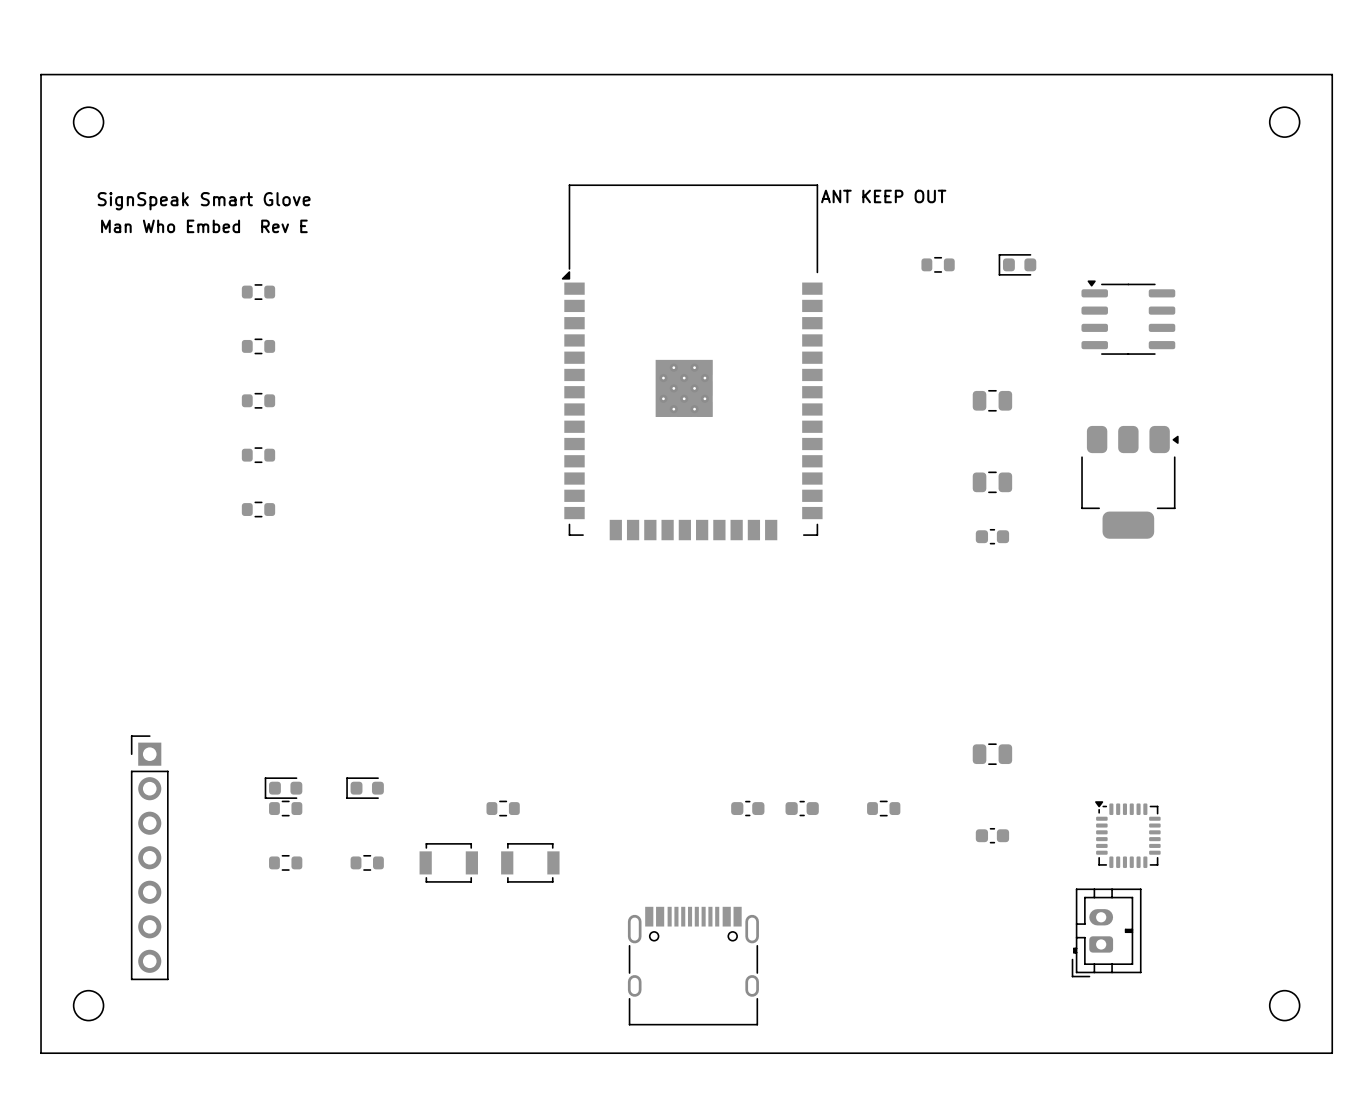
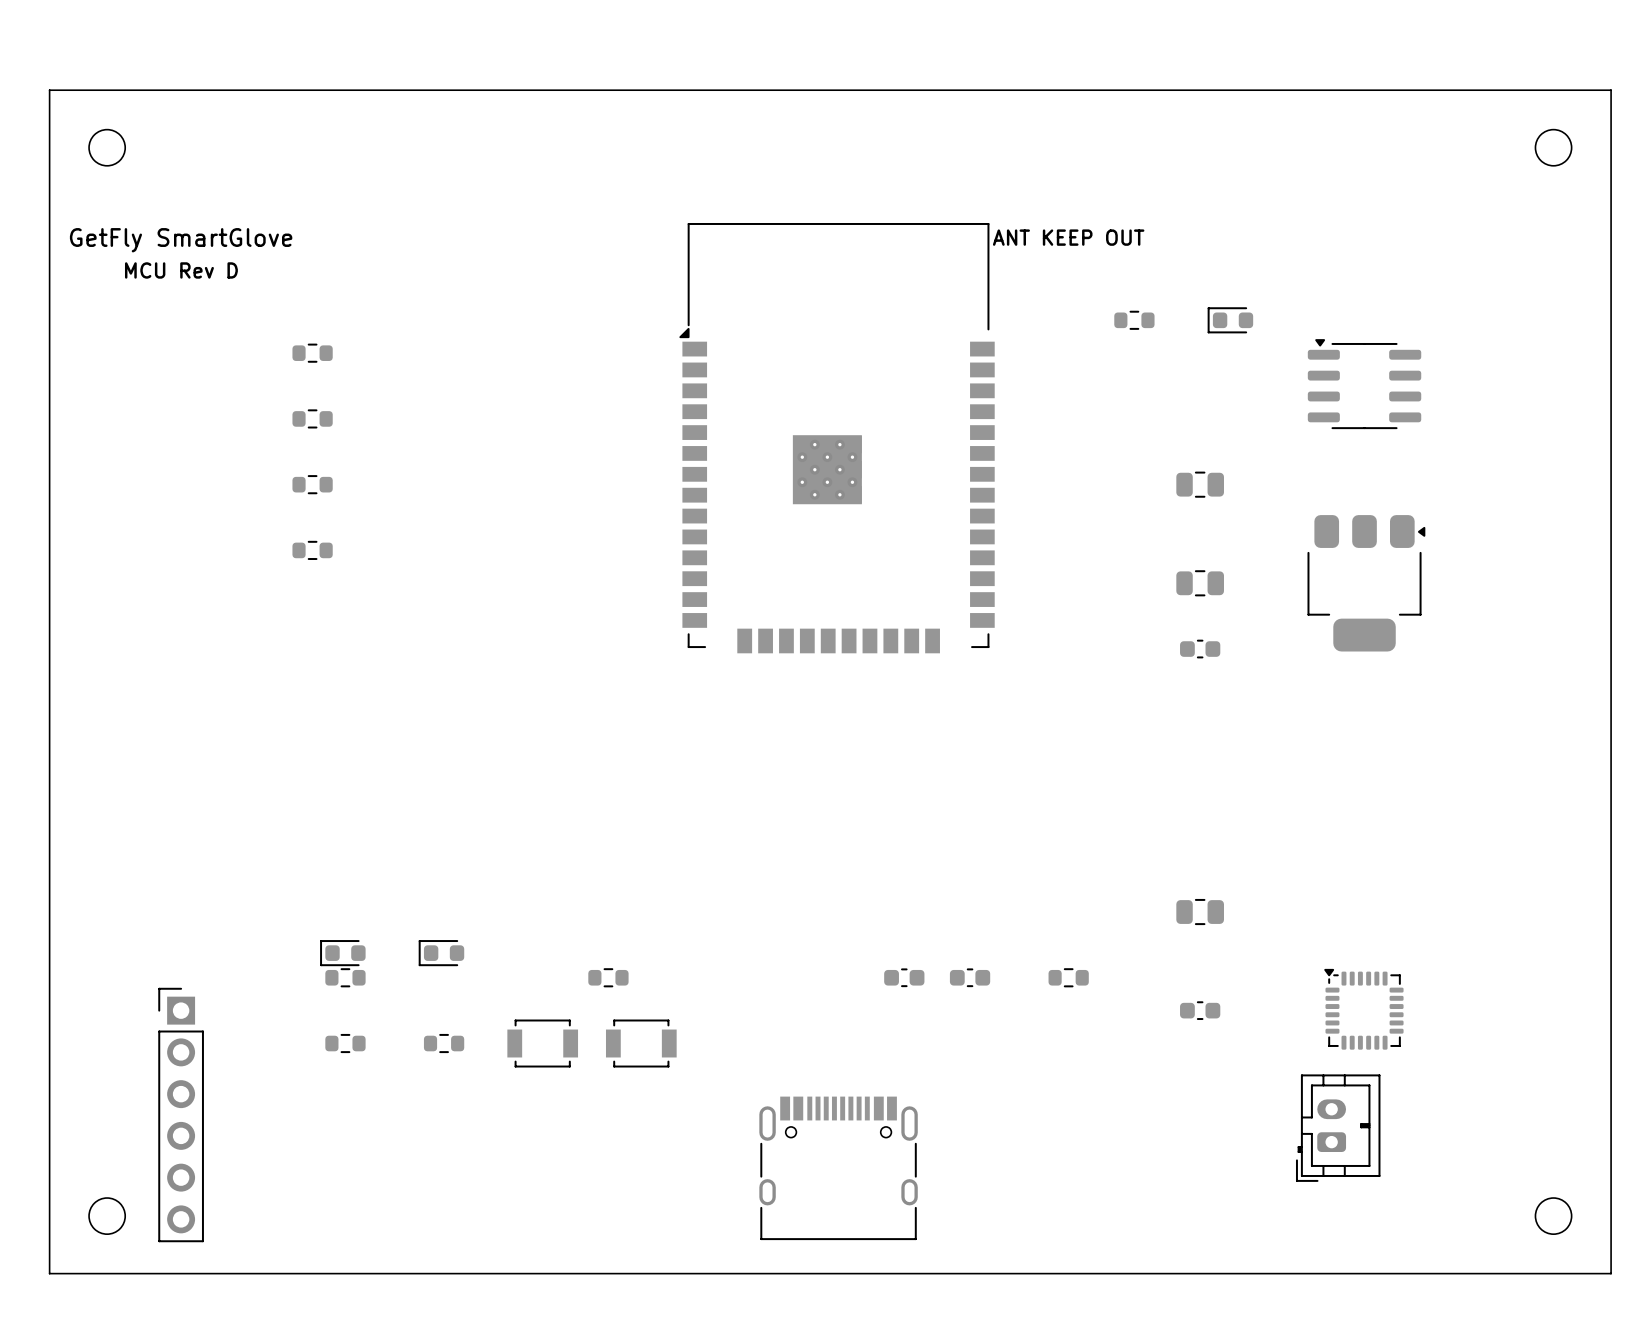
text: SignSpeak Smart Glove (204, 201) -> GetFly SmartGlove (181, 240)
text: none -> MCU Rev D (181, 270)
text: Man Who Embed Rev E (204, 226) -> none
part: (258, 509) -> none
part: (149, 857) -> none
part: none -> (181, 1115)

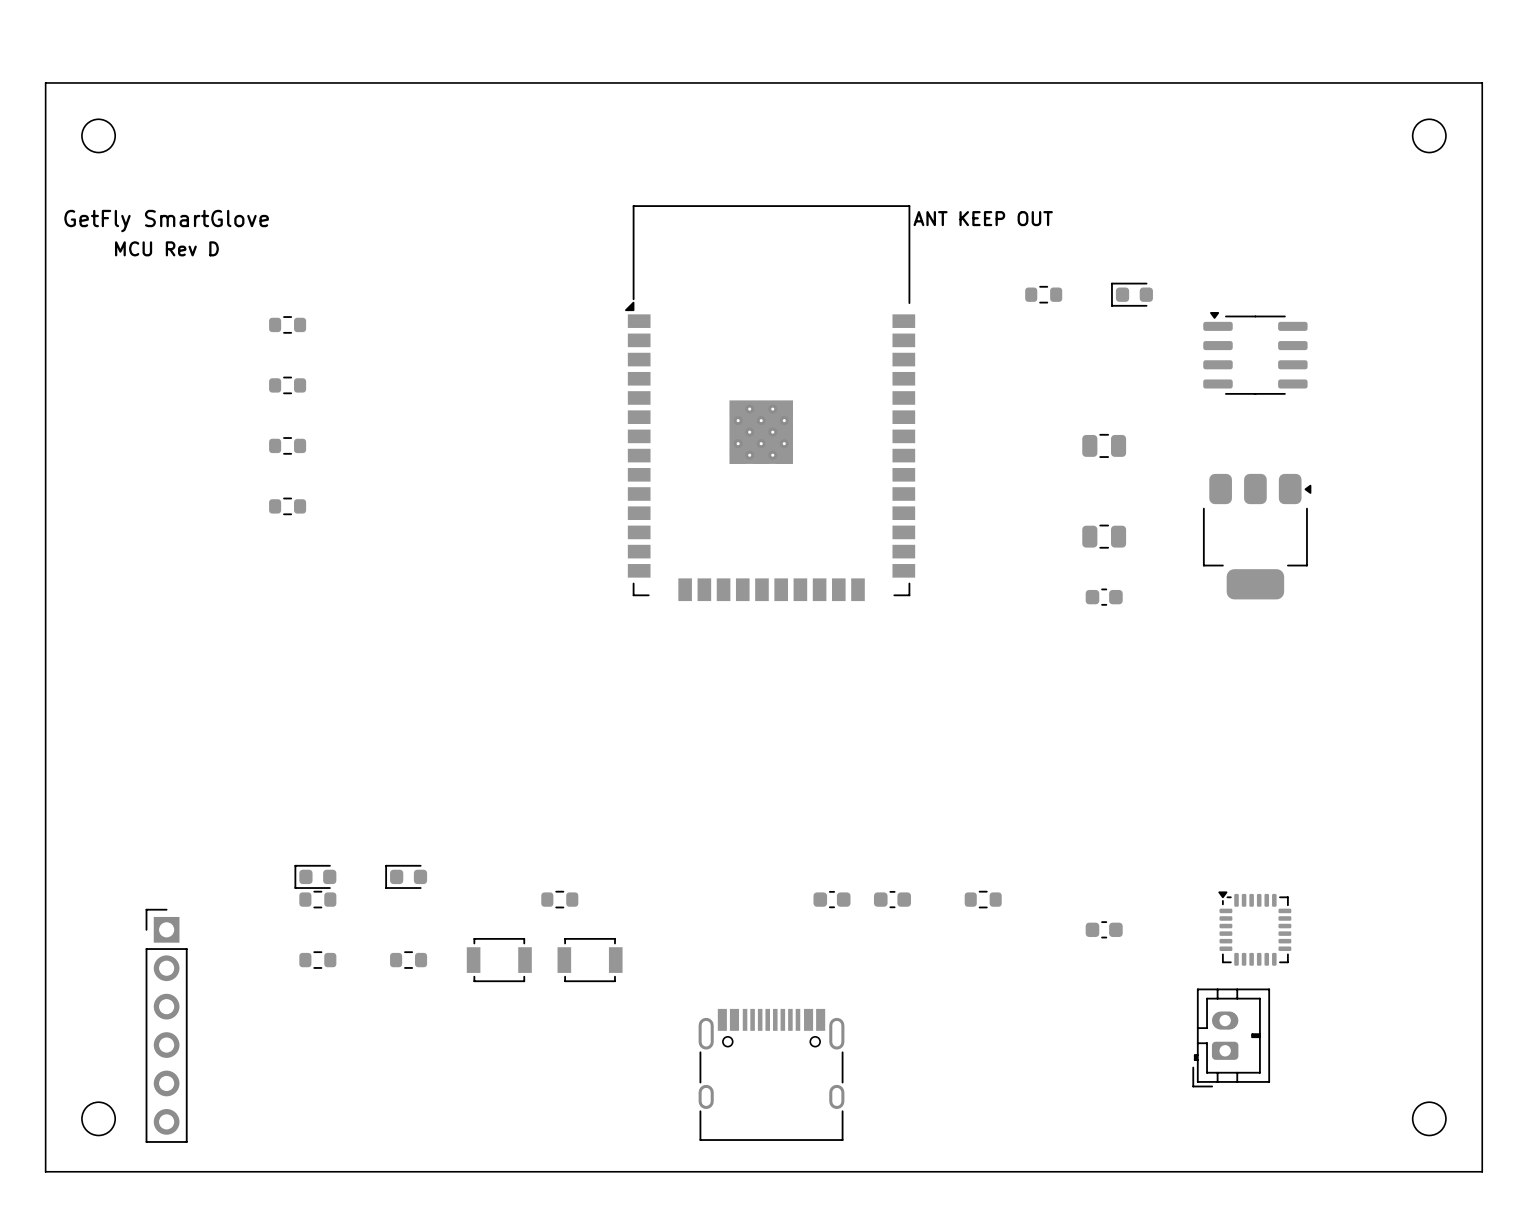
part: (1200, 912) -> none

